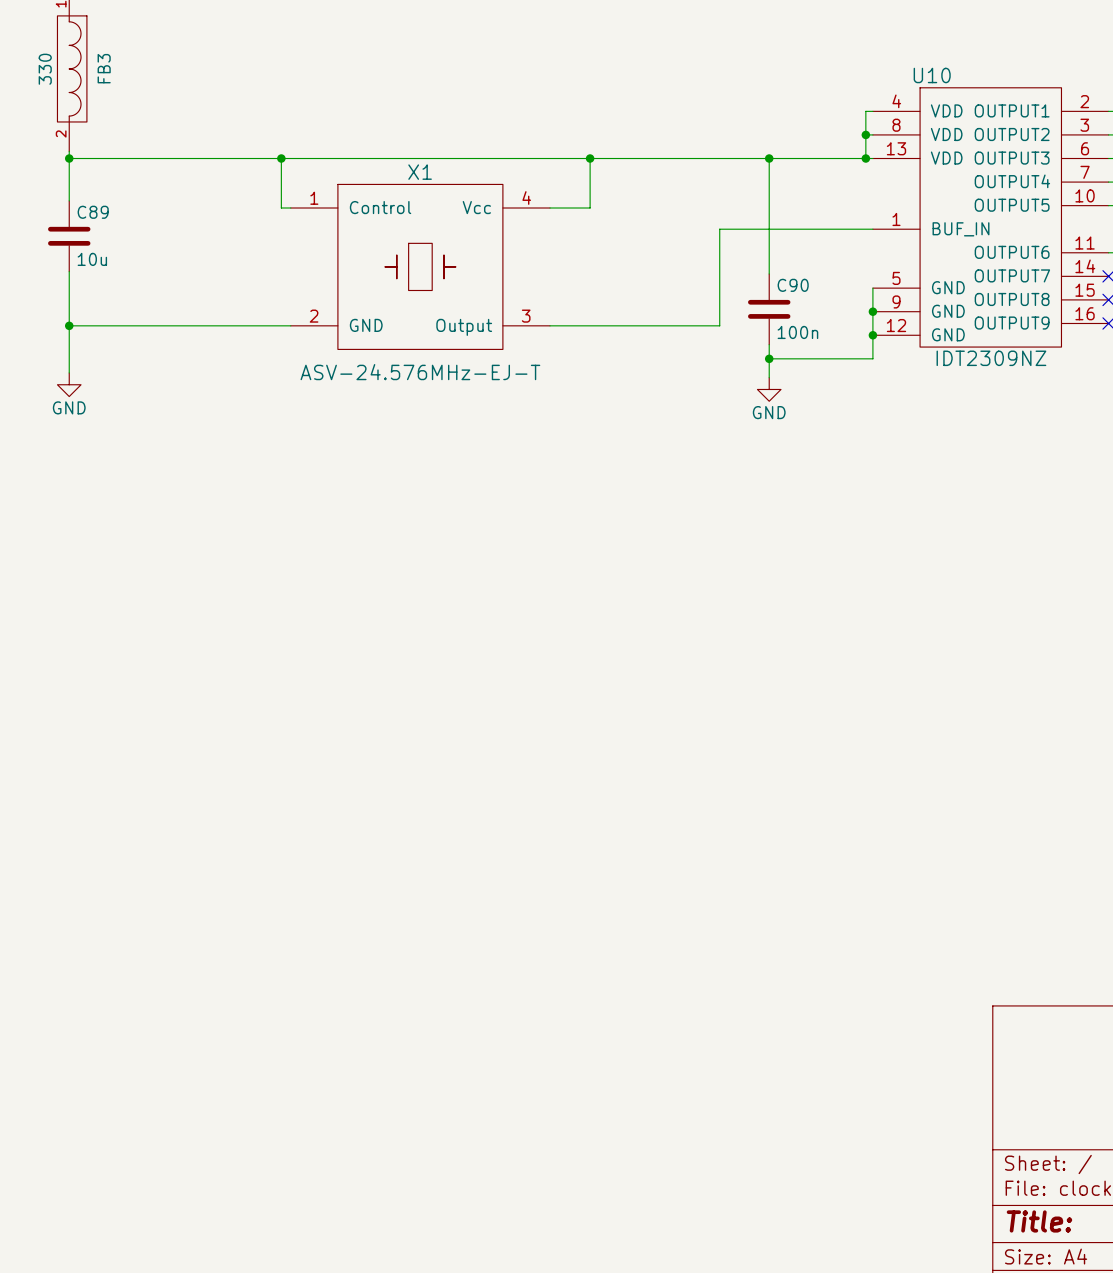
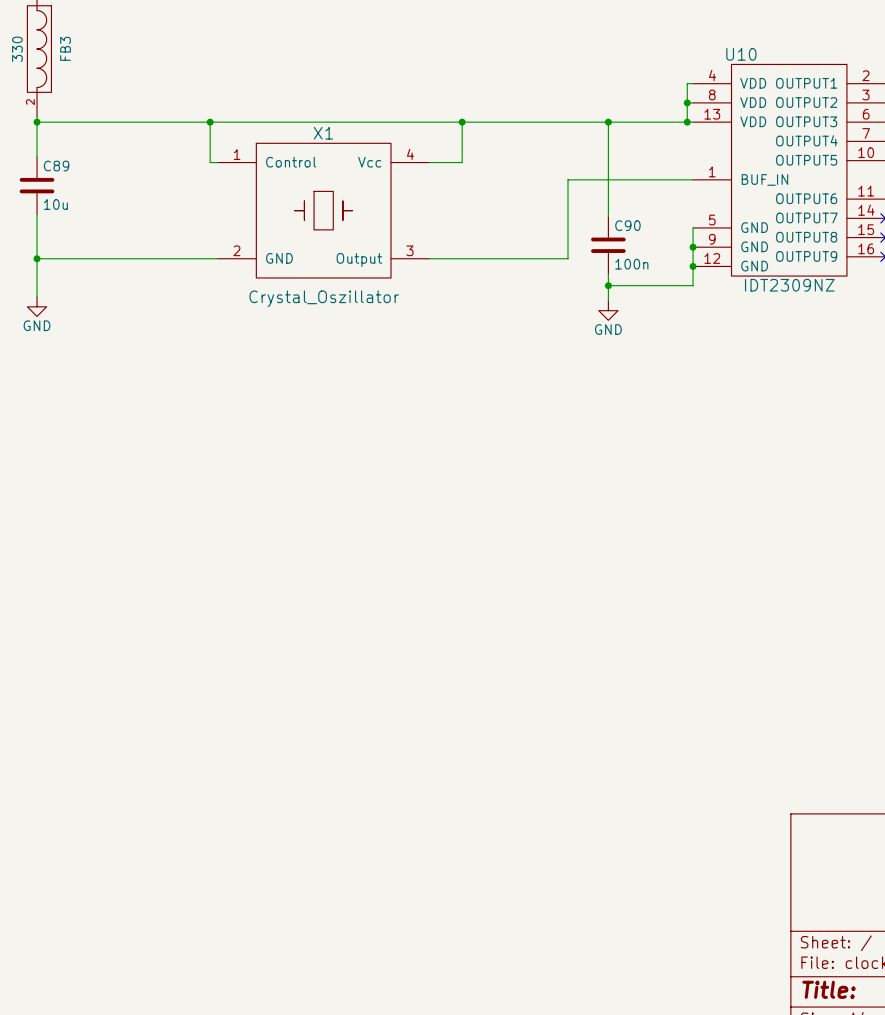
X1 value: ASV-24.576MHz-EJ-T (420, 372) -> Crystal_Oszillator (324, 298)

